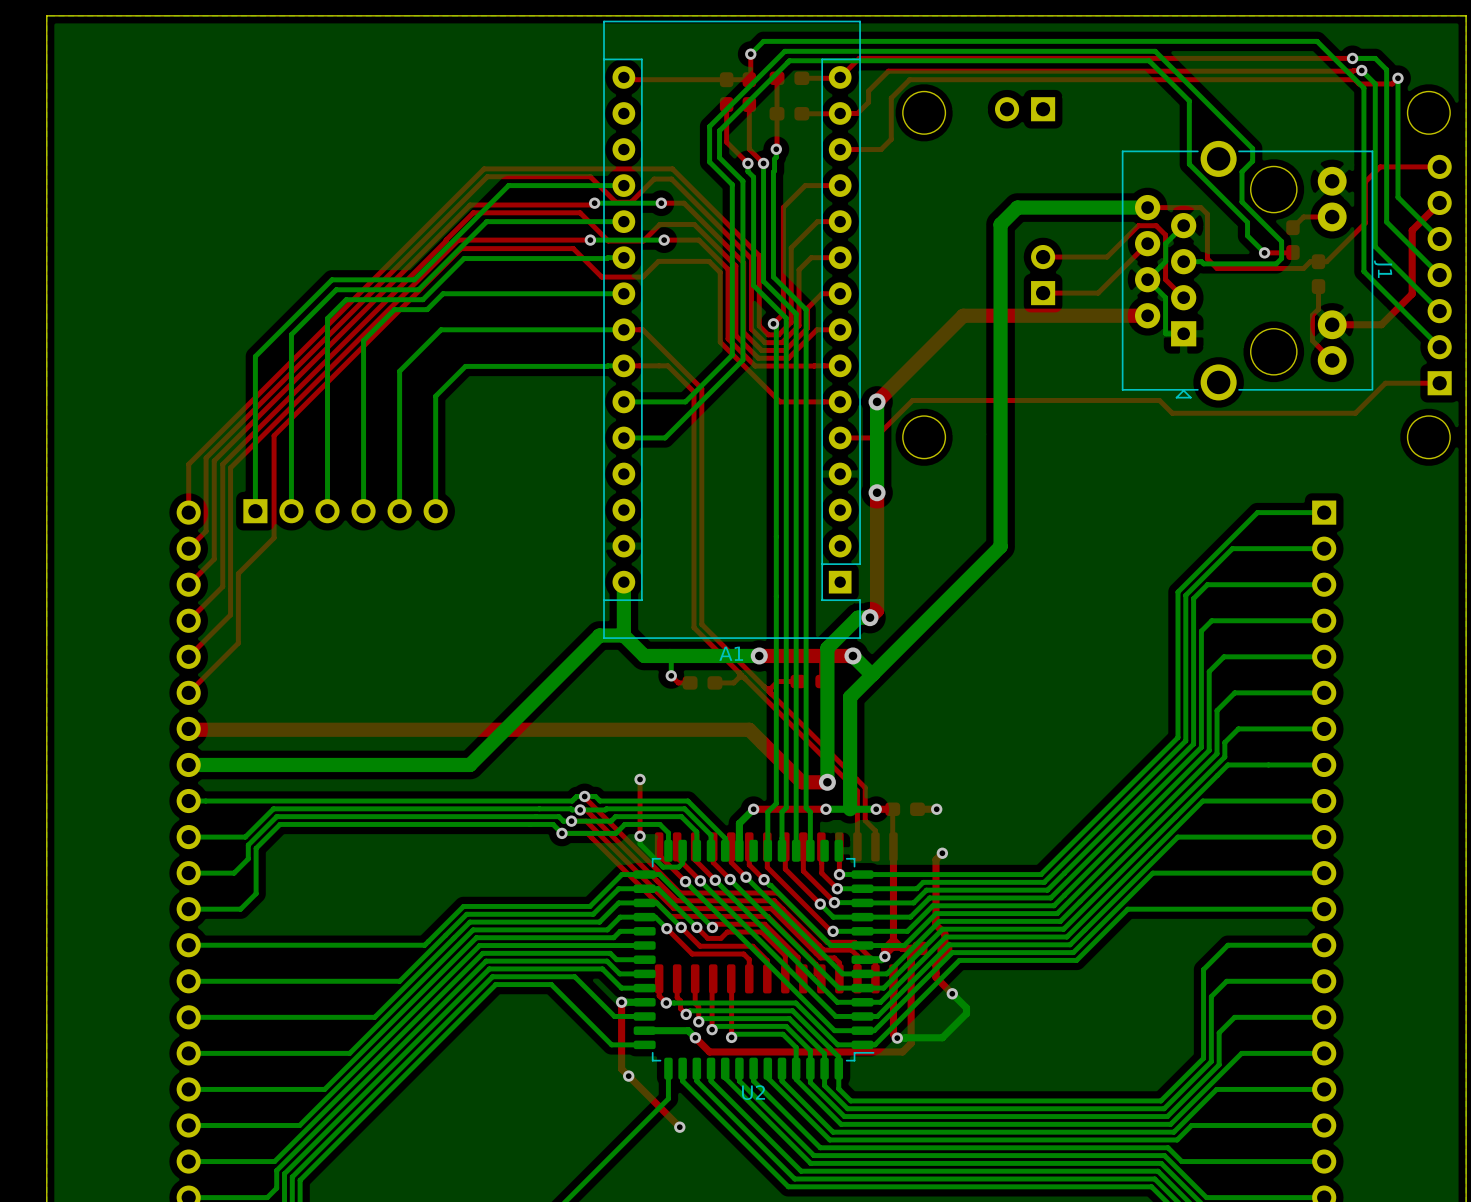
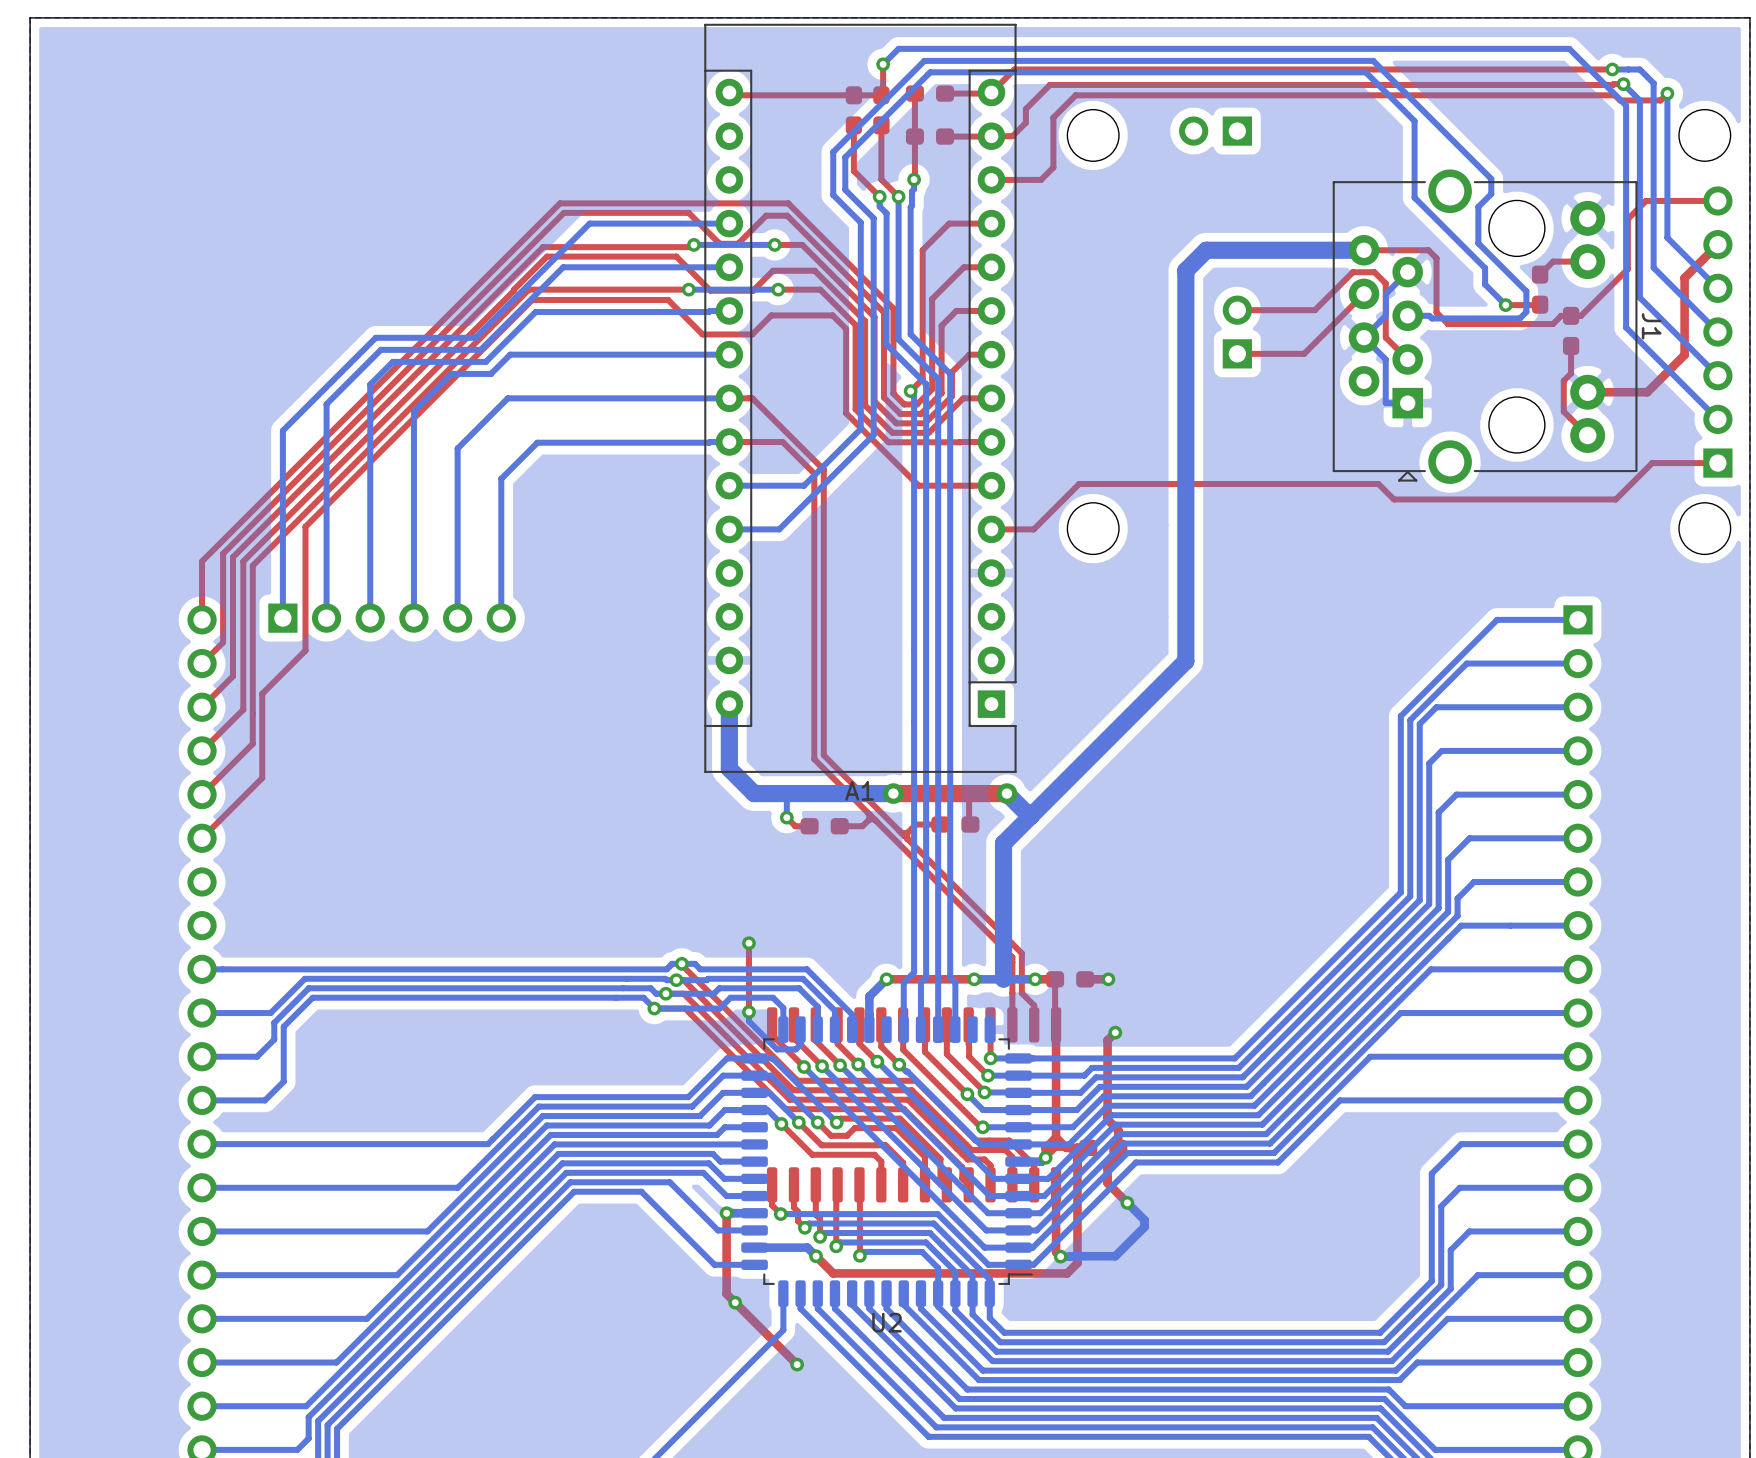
top track: (1147, 315) (963, 315) (877, 401) -> none
bottom track: (877, 401) (877, 492) -> none
via: (877, 401) -> none
top track: (877, 492) (877, 610) (869, 617) -> none
via: (877, 492) -> none
bottom track: (869, 617) (857, 617) (827, 648) (827, 782) -> none
via: (869, 617) -> none
bottom track: (623, 635) (599, 635) (470, 764) (188, 764) -> none
top track: (188, 728) (749, 729) (801, 782) (827, 782) -> none
via: (827, 782) -> none

